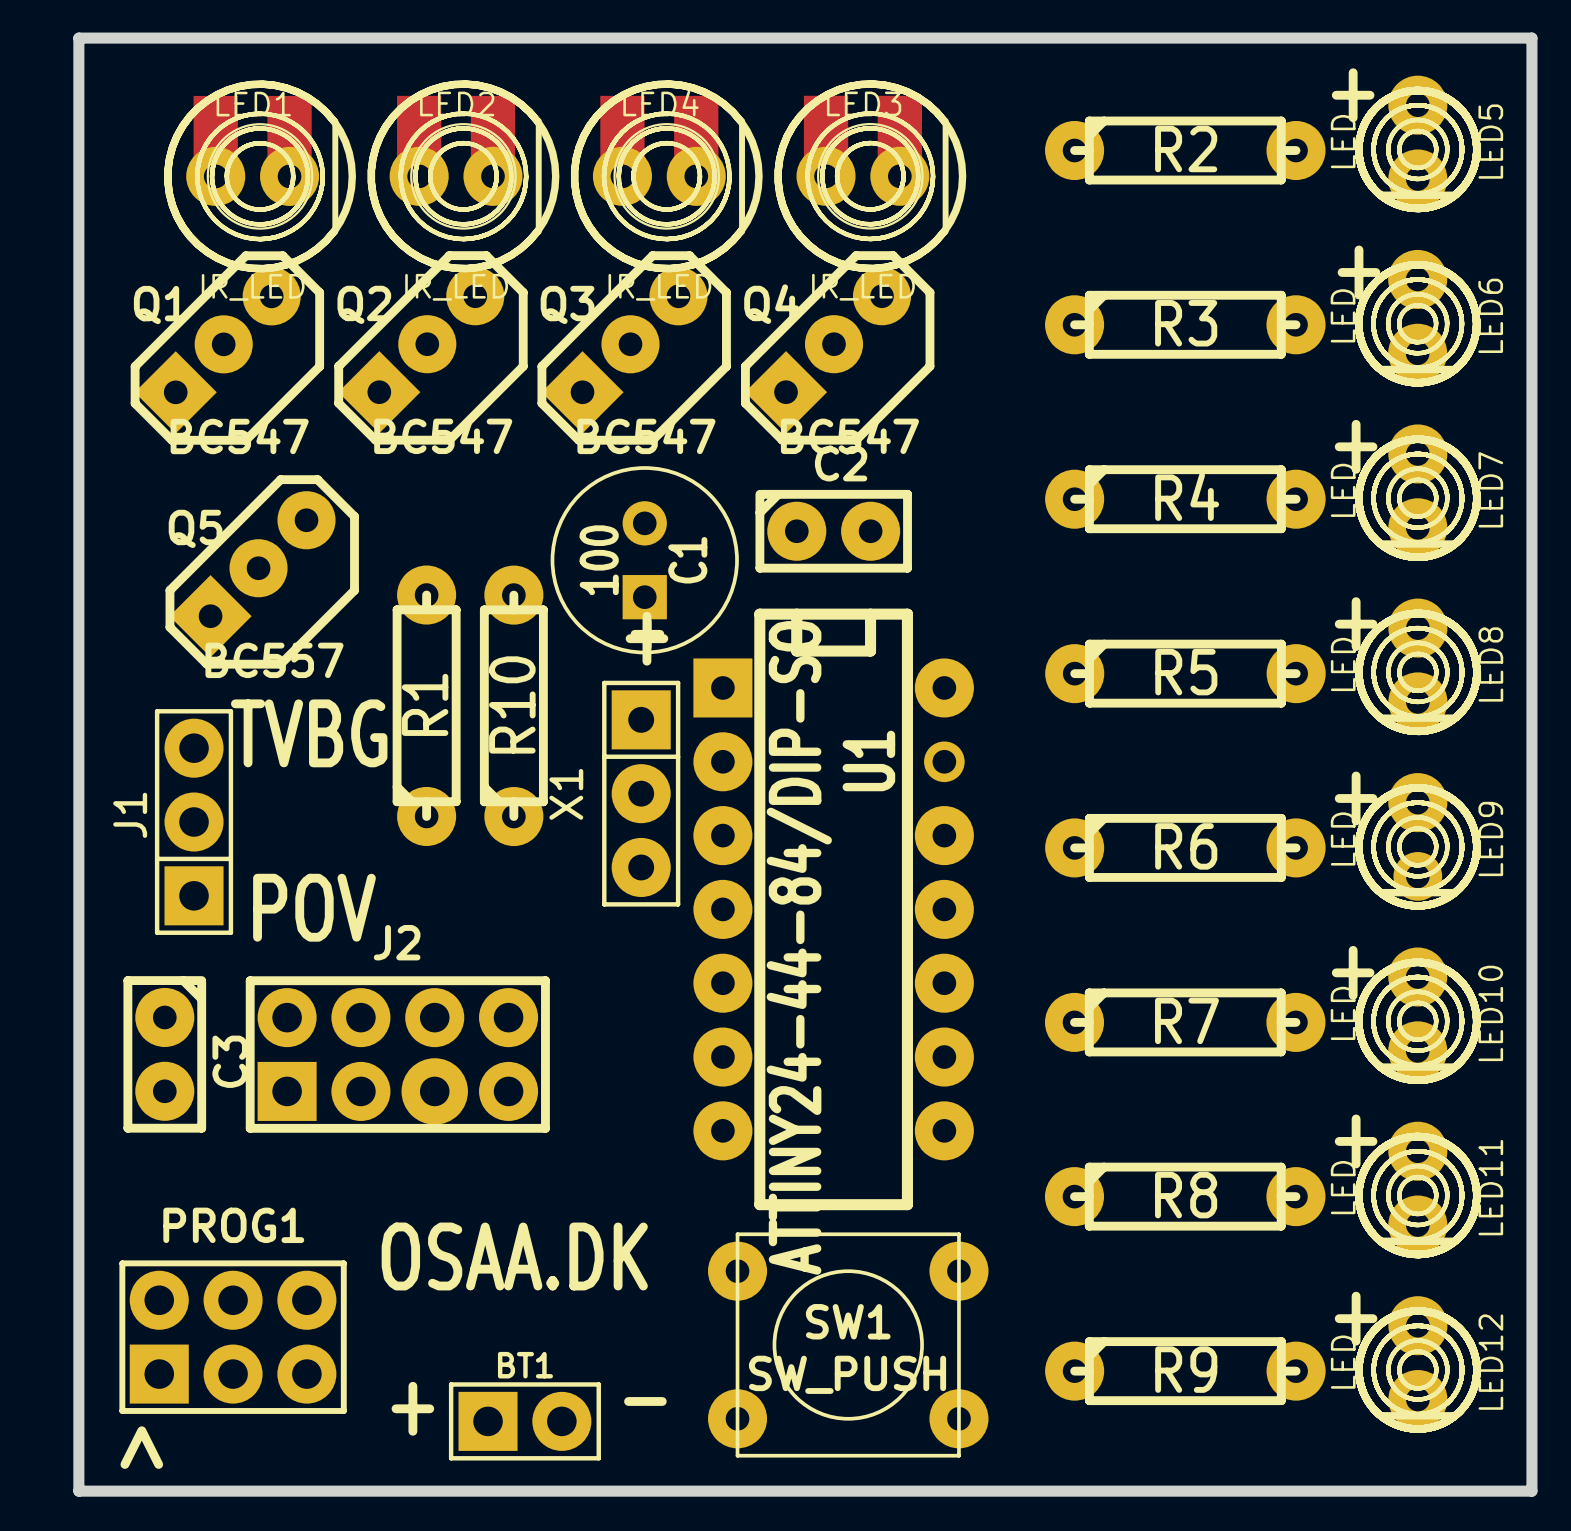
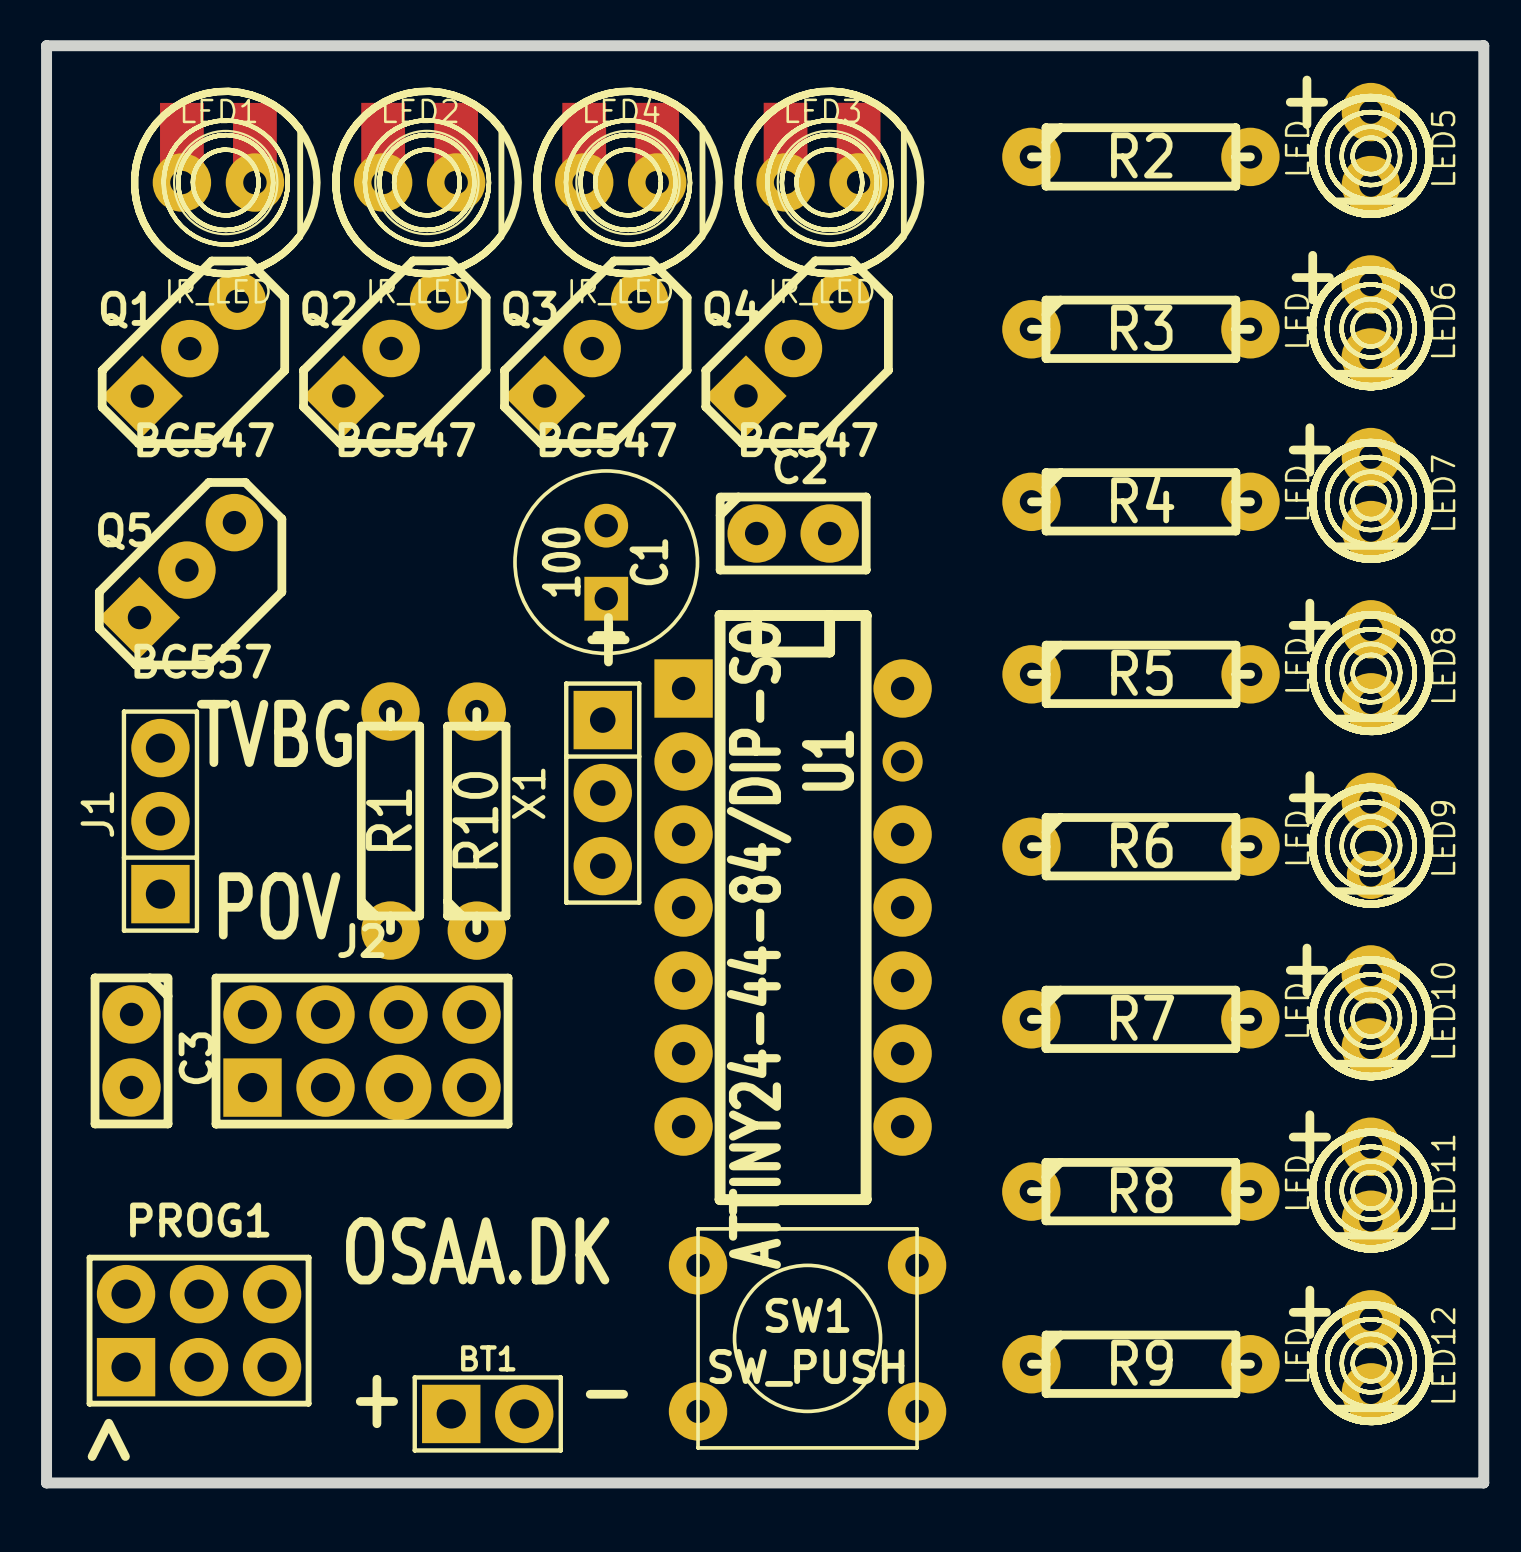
Q5 position: (262, 571) -> (190, 573)
R1 position: (426, 705) -> (390, 821)
R10 position: (513, 705) -> (476, 821)

